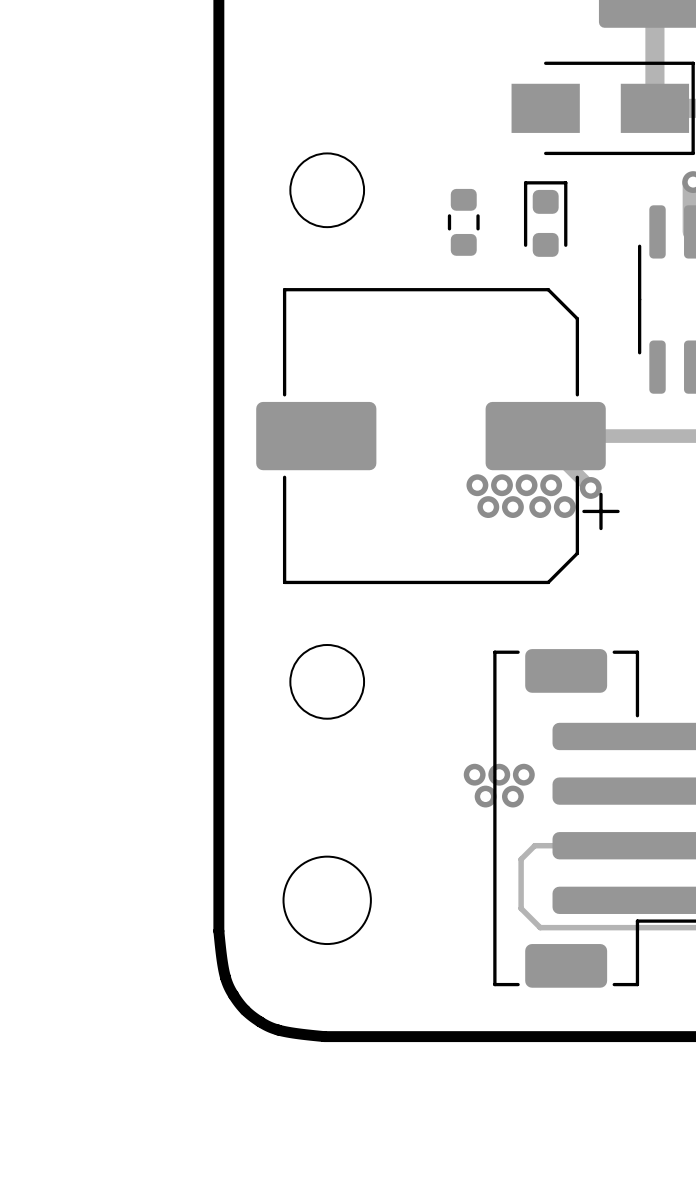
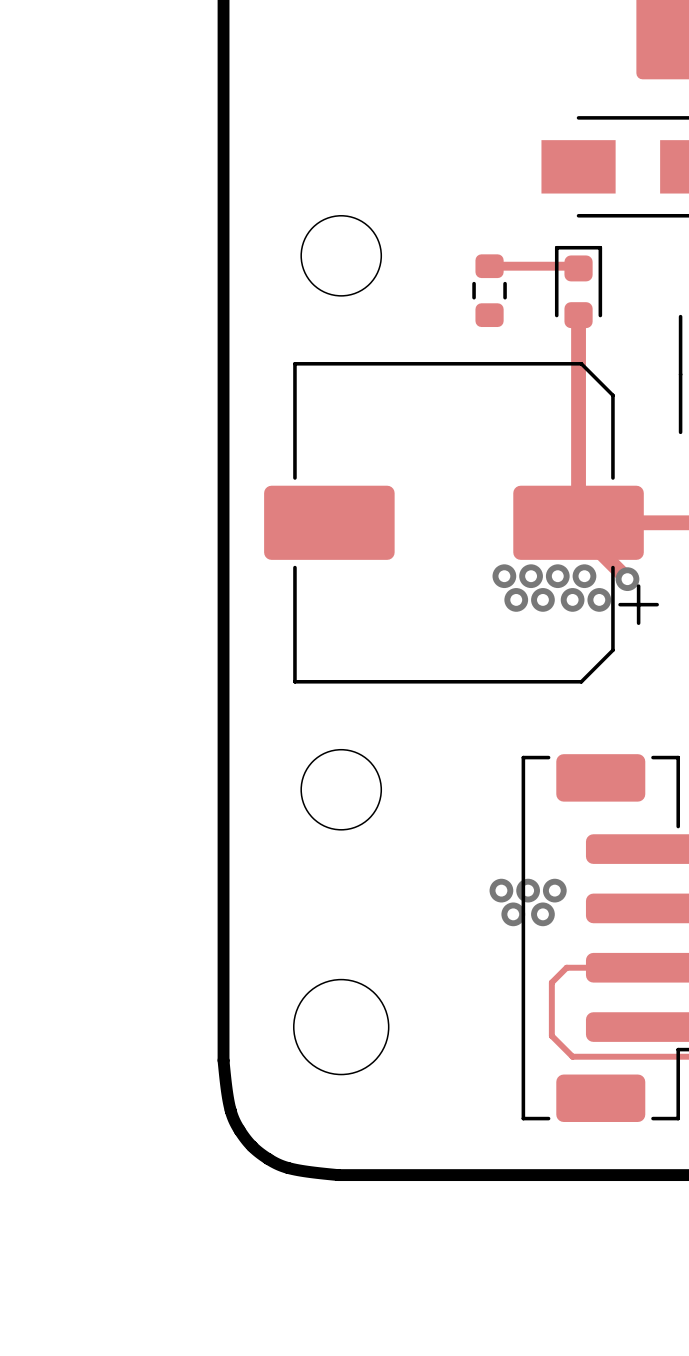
track: none -> (489, 266) (576, 266) (578, 268)
track: none -> (578, 315) (578, 522)

